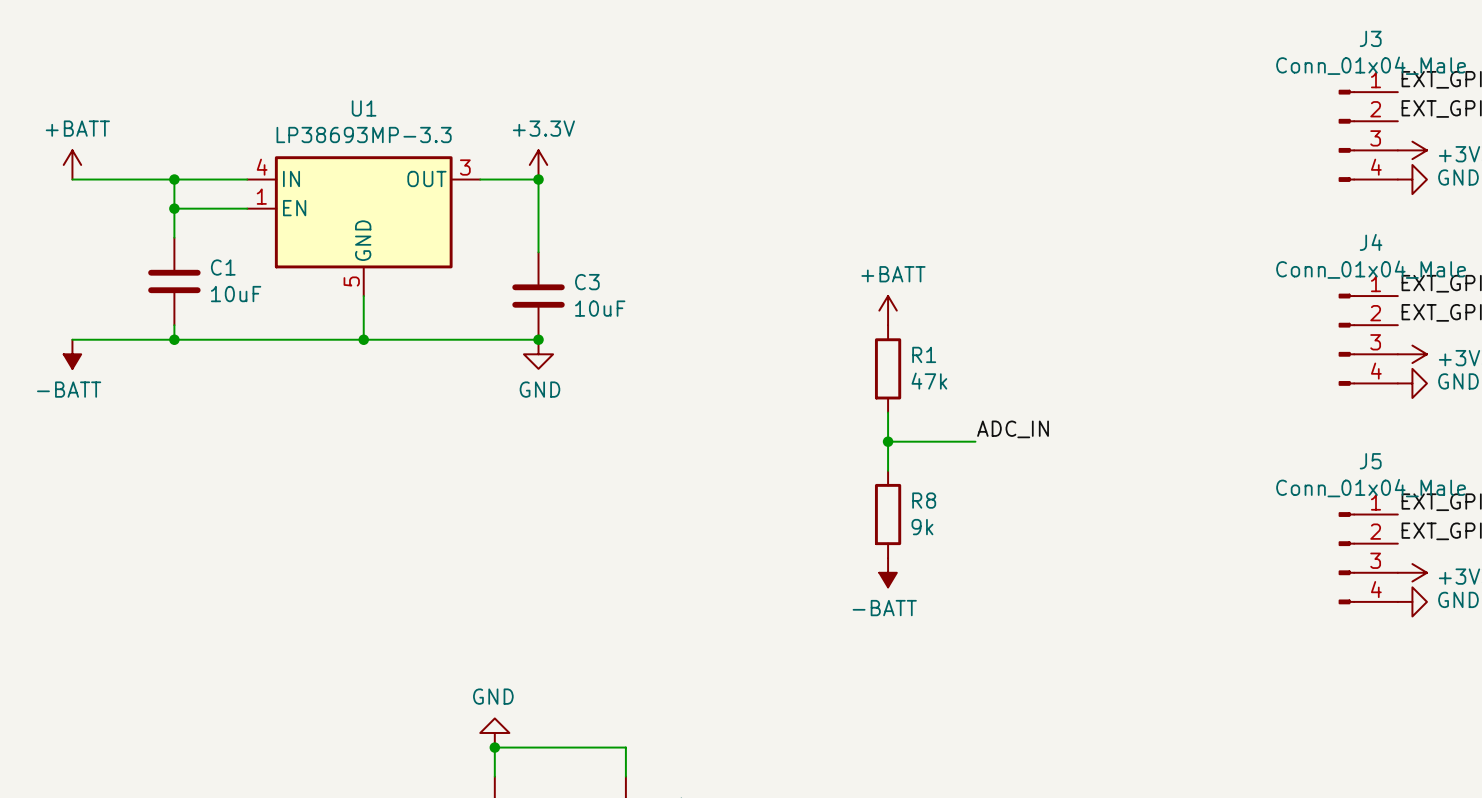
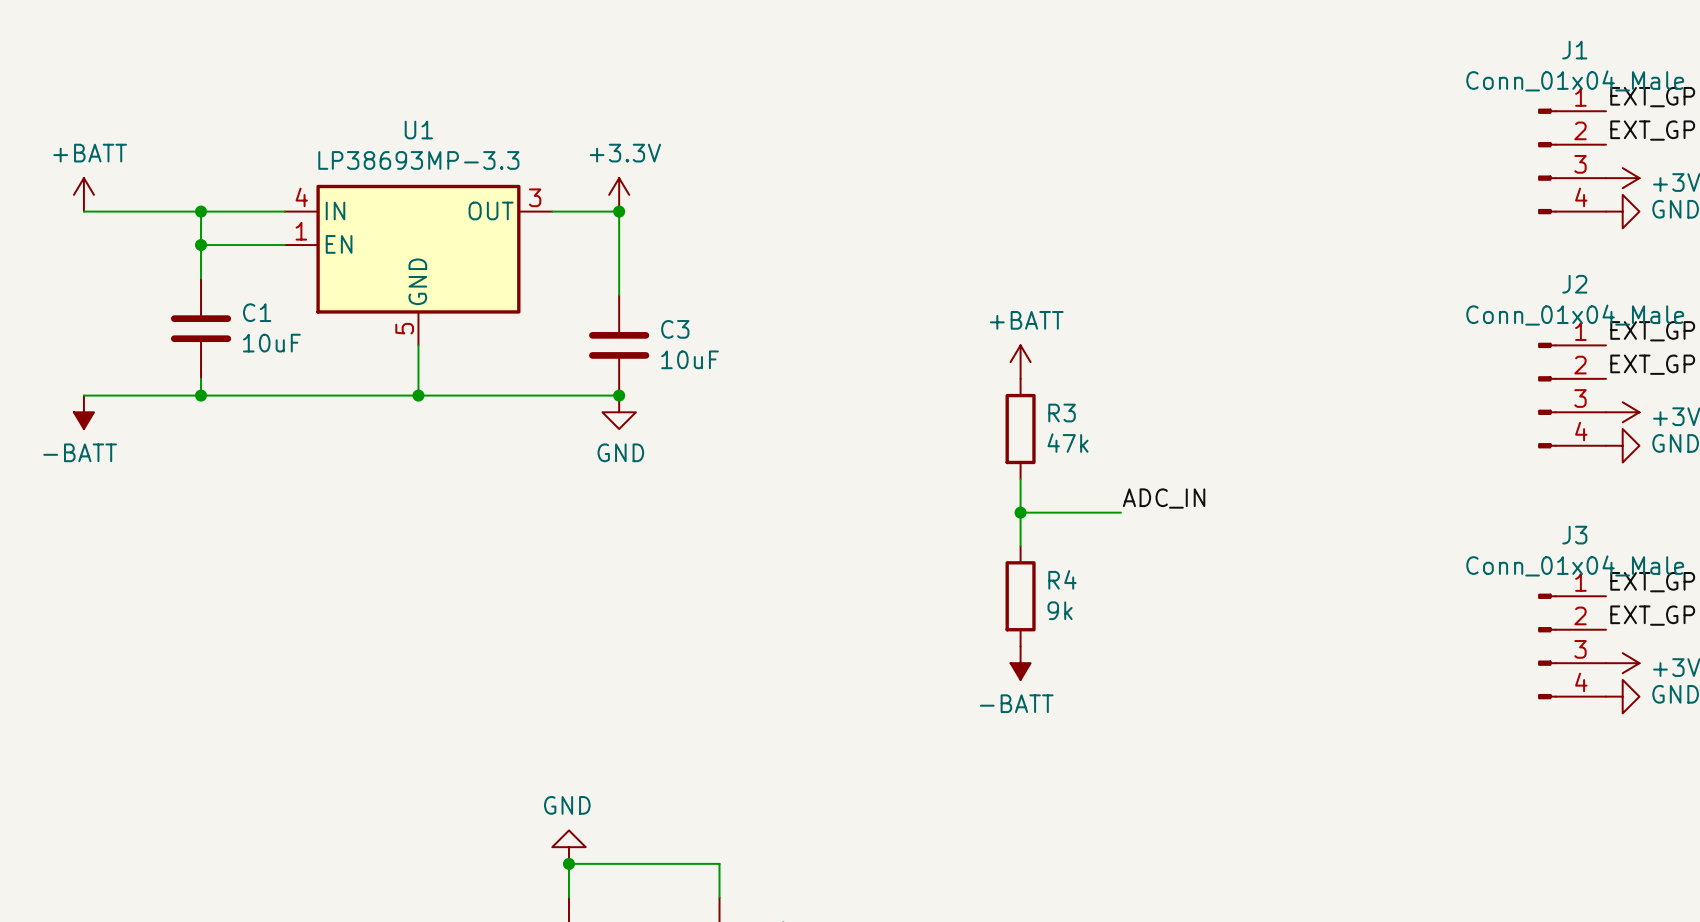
J3 name: J3 (1370, 38) -> J1 (1574, 50)
J4 name: J4 (1371, 242) -> J2 (1574, 284)
R1 name: R1 (924, 354) -> R3 (1062, 413)
J5 name: J5 (1370, 461) -> J3 (1574, 535)
R8 name: R8 (924, 500) -> R4 (1062, 579)

